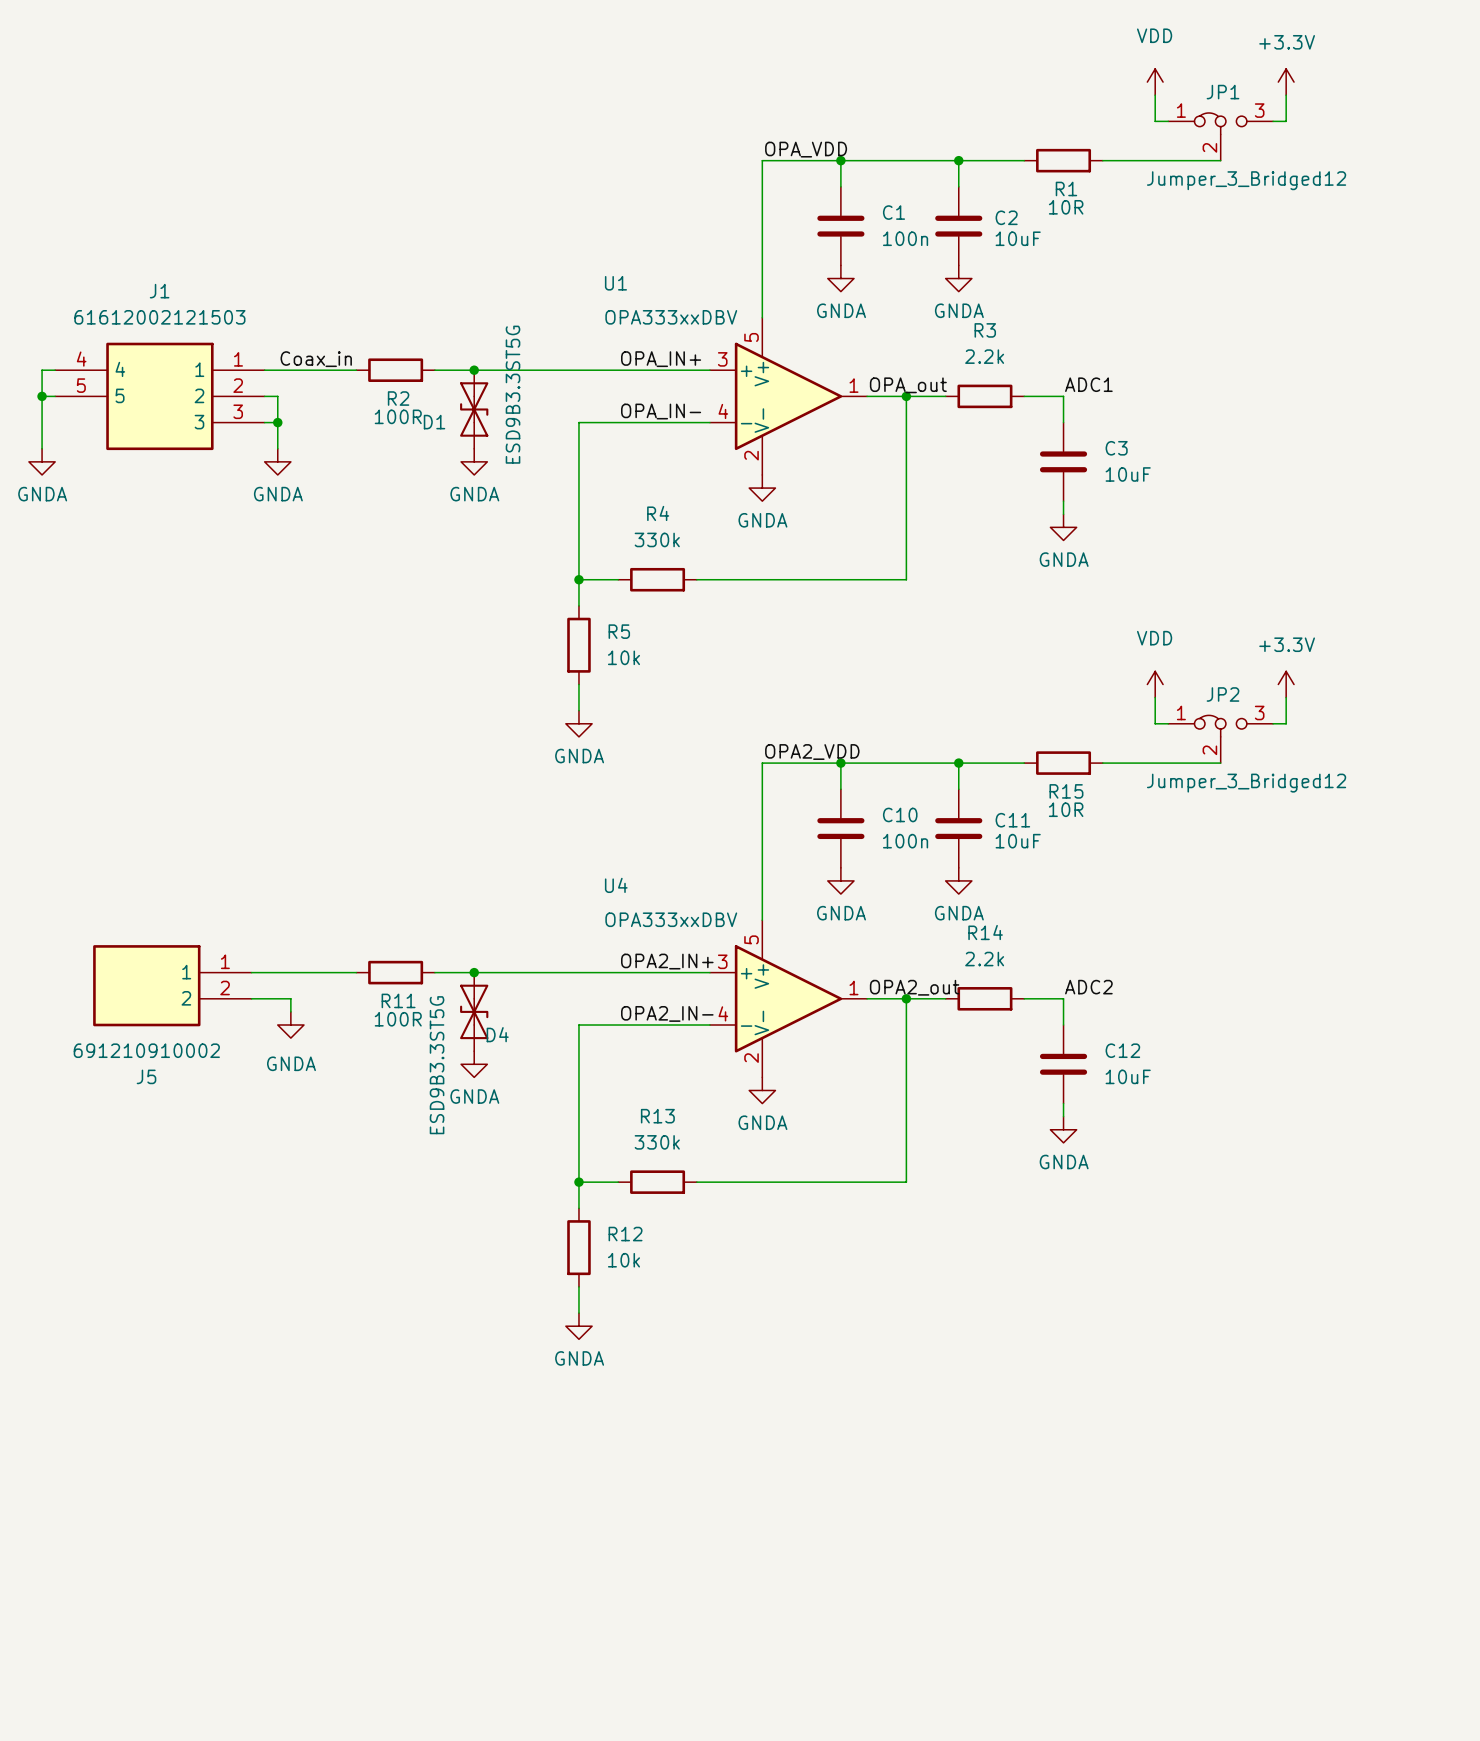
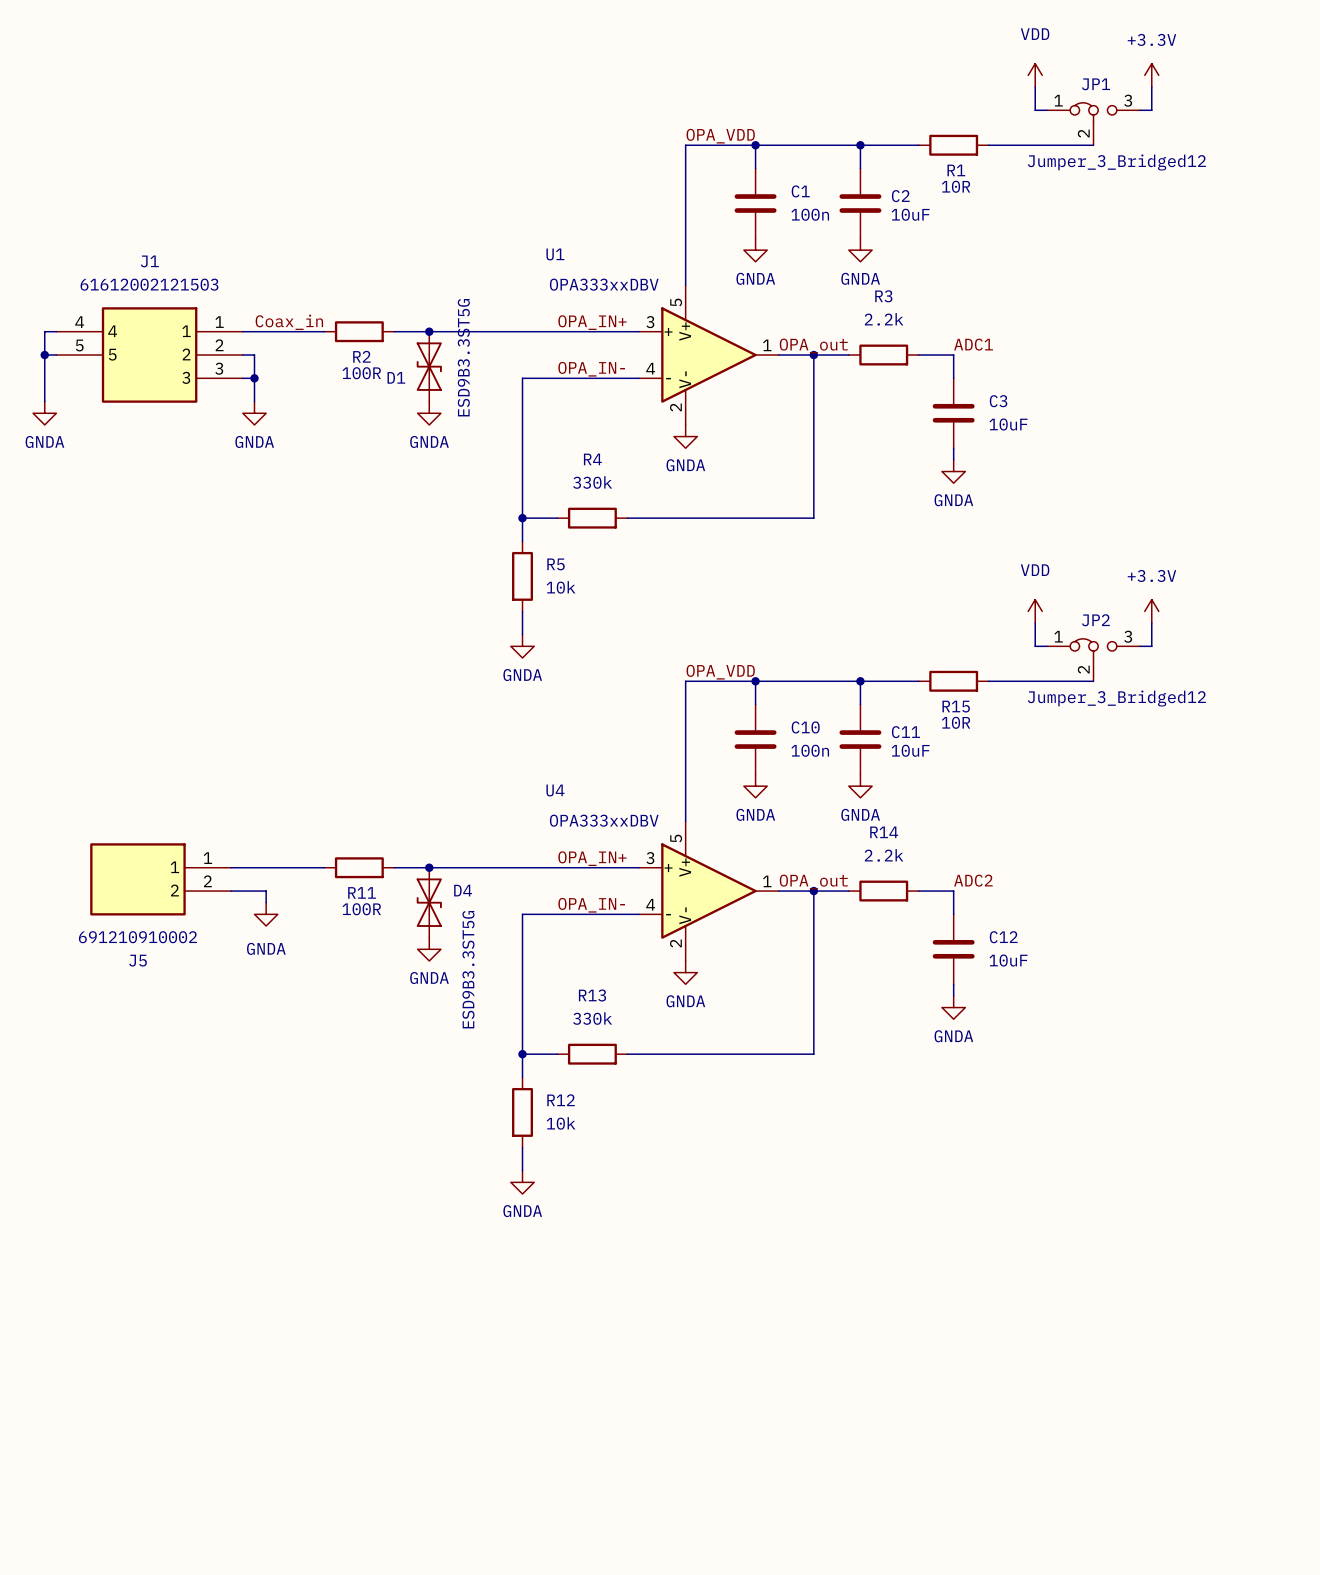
label: OPA2_VDD (812, 752) -> OPA_VDD (720, 672)
label: OPA2_IN+ (667, 961) -> OPA_IN+ (592, 858)
label: OPA2_out (914, 987) -> OPA_out (813, 881)
label: OPA2_IN- (667, 1013) -> OPA_IN- (591, 905)
D4 name position: D4 (497, 1034) -> D4 (463, 890)
D4 value position: ESD9B3.3ST5G (437, 1065) -> ESD9B3.3ST5G (468, 969)

